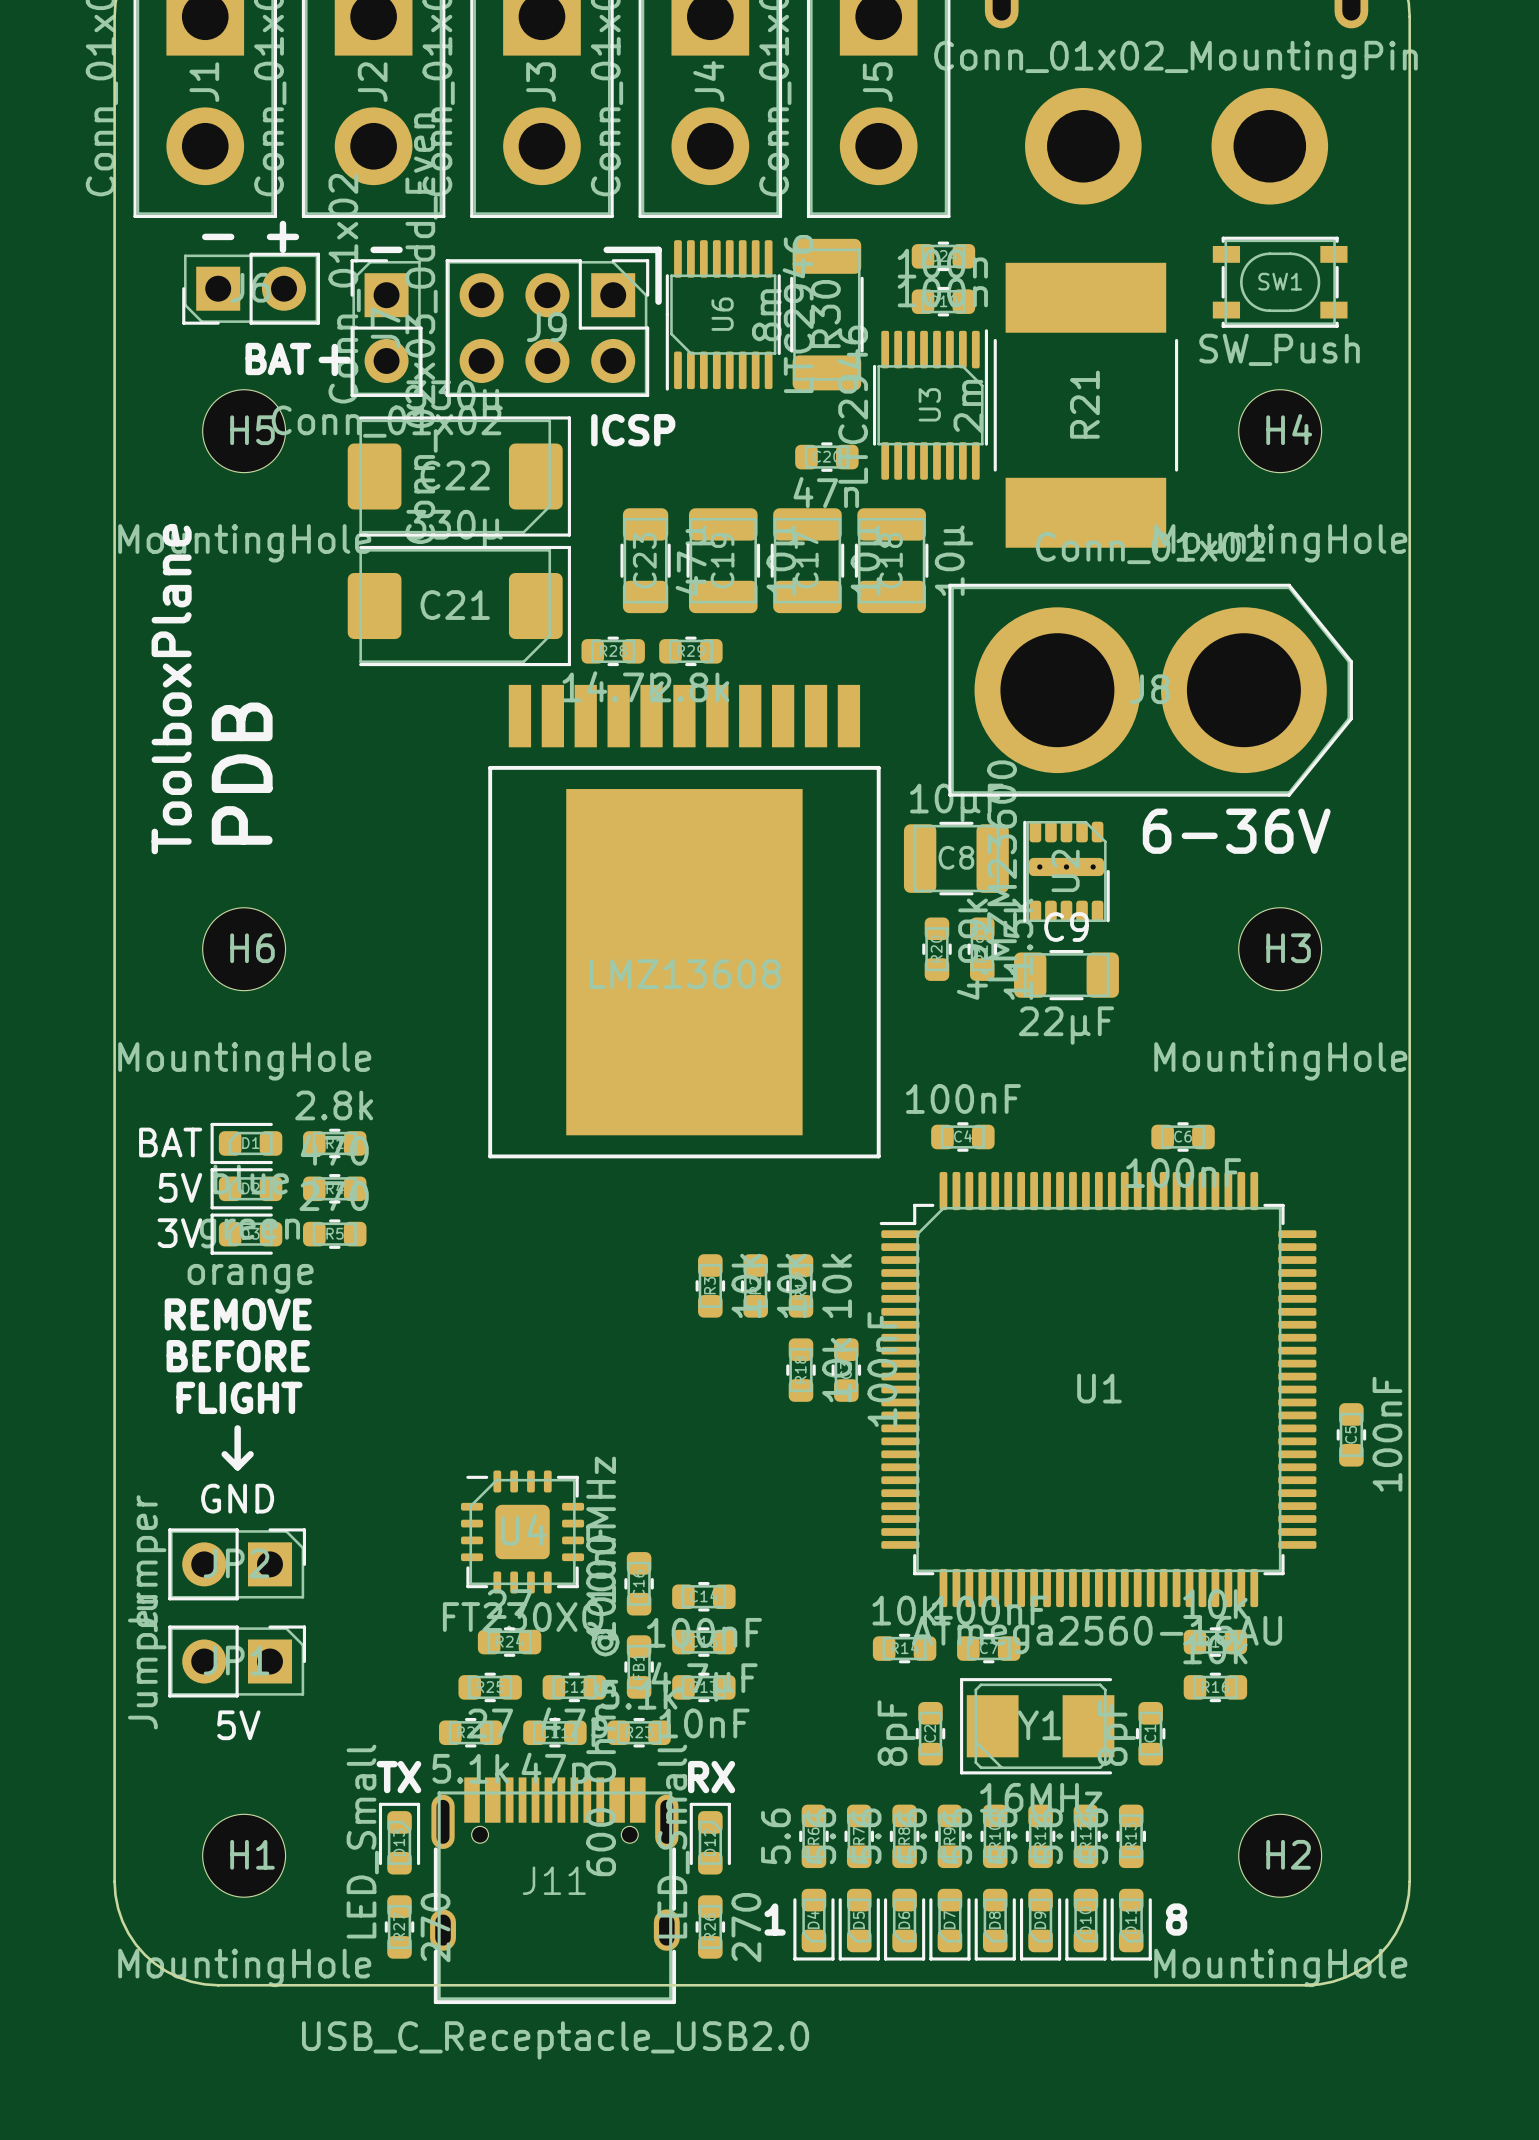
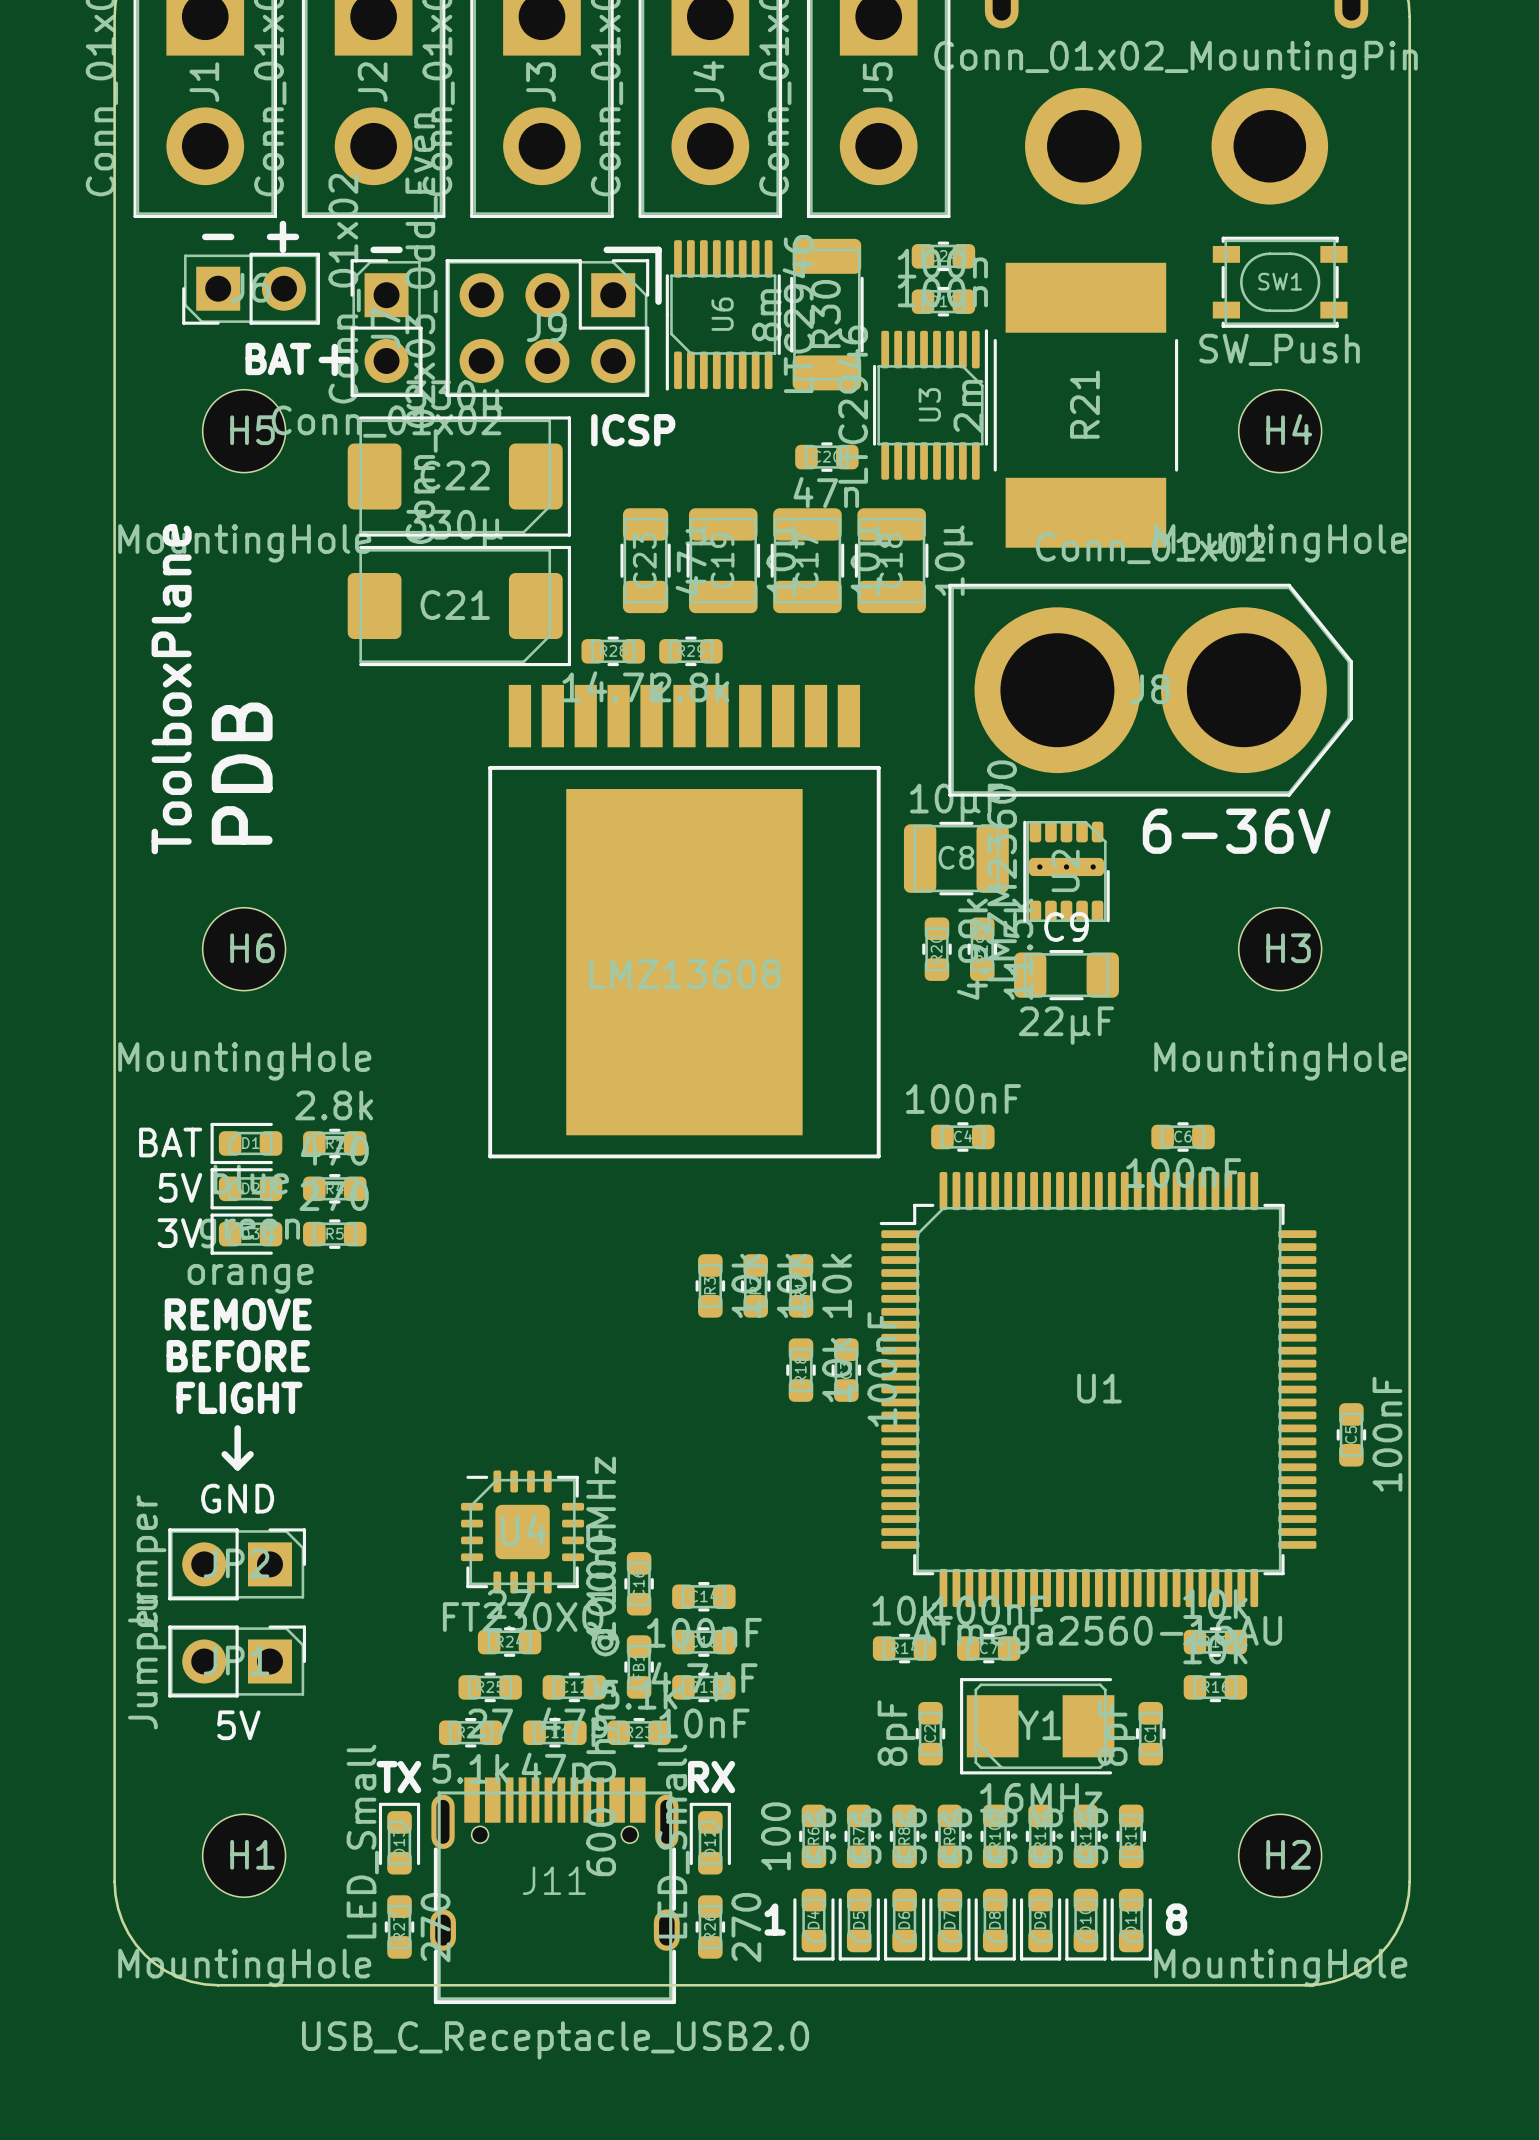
R6 value: 5.6 (775, 1836) -> 100 (775, 1836)

